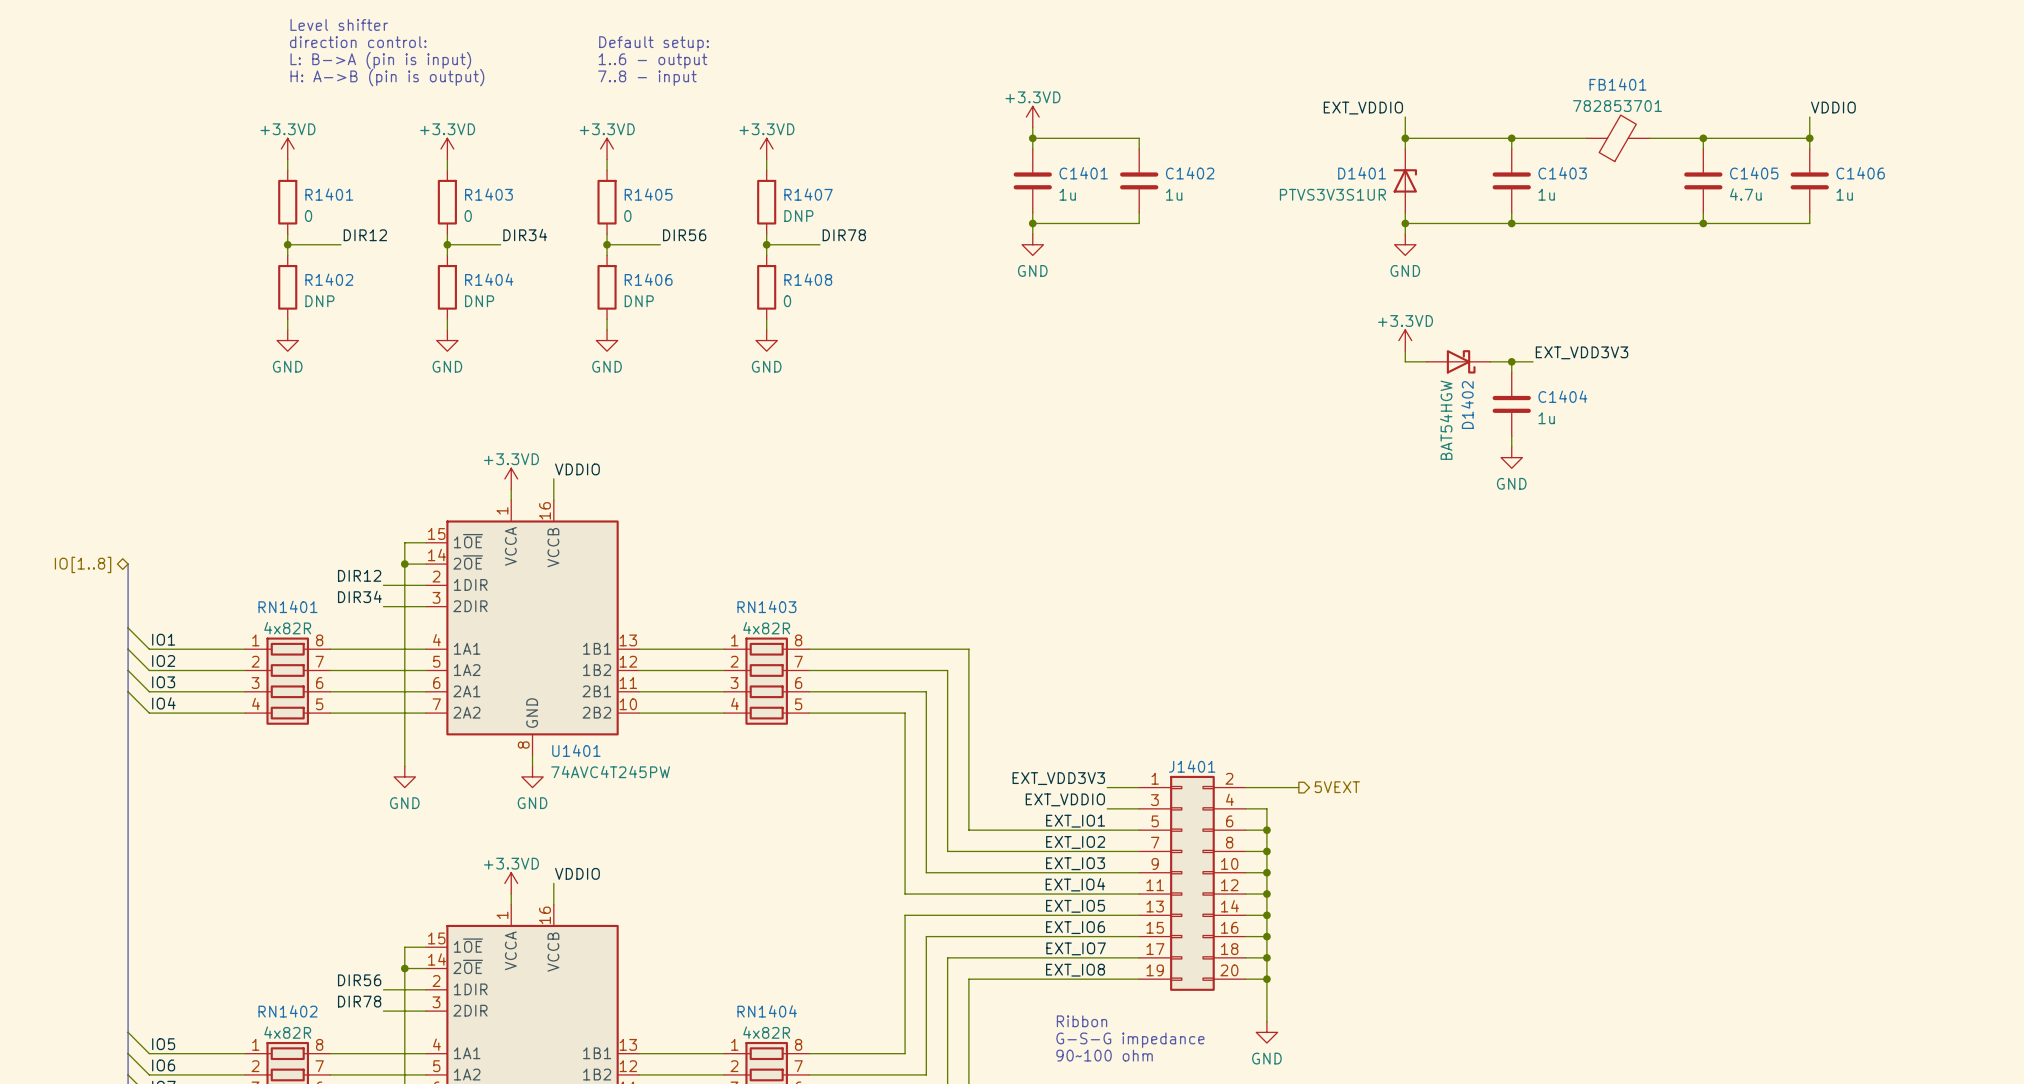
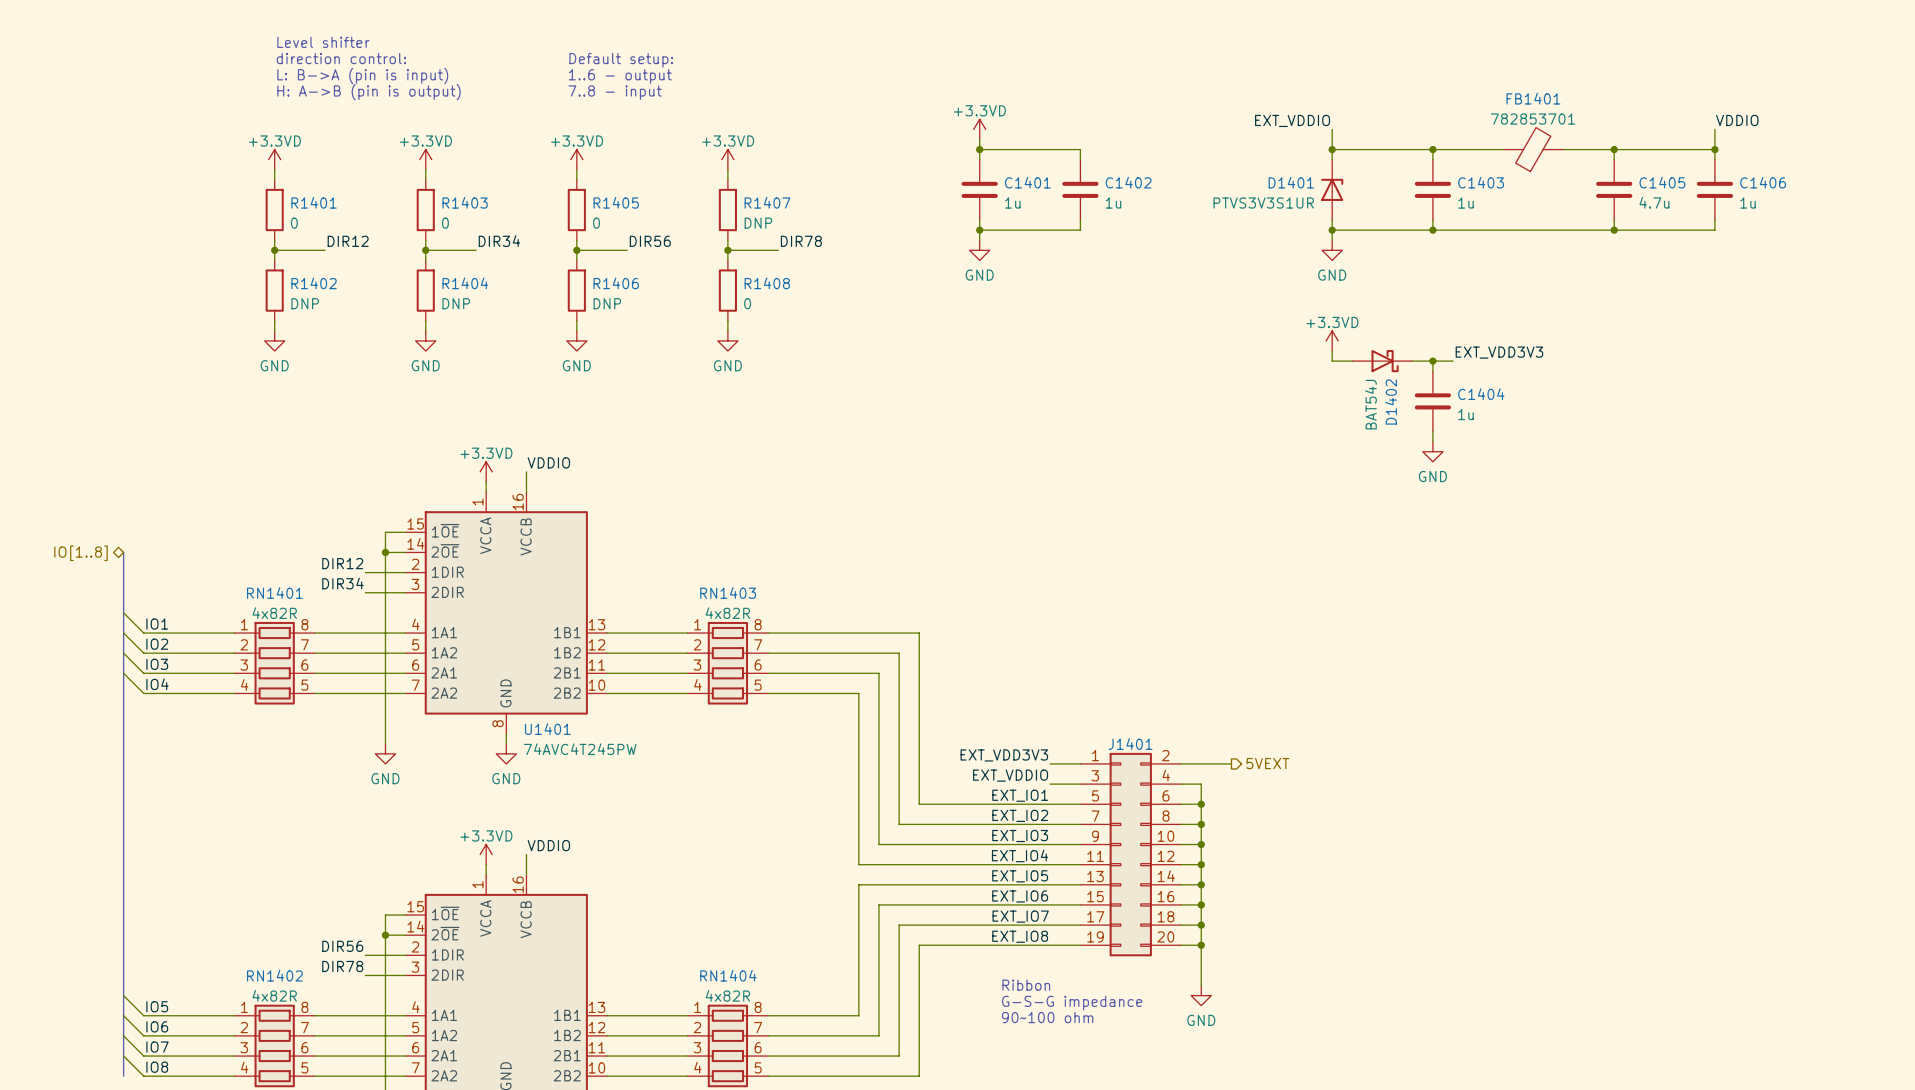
D1402 value: BAT54HGW (1446, 420) -> BAT54J (1370, 404)

